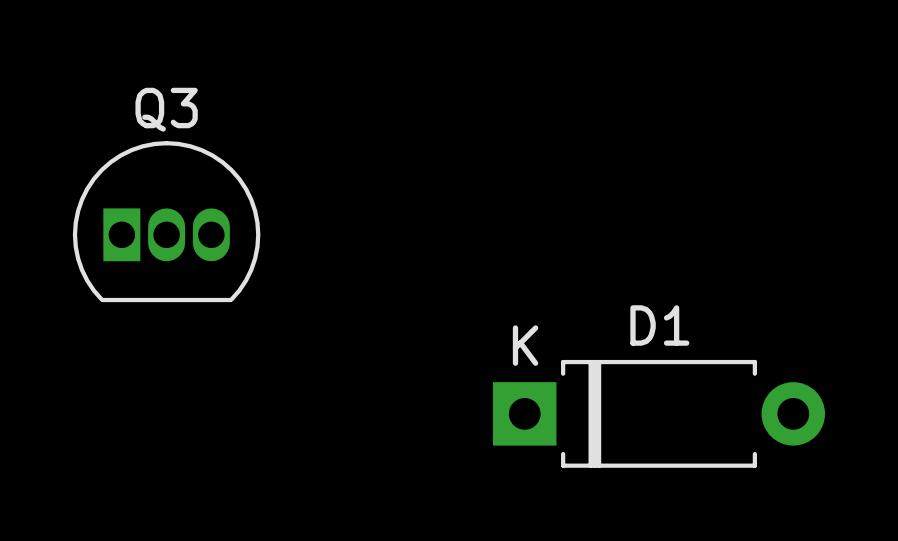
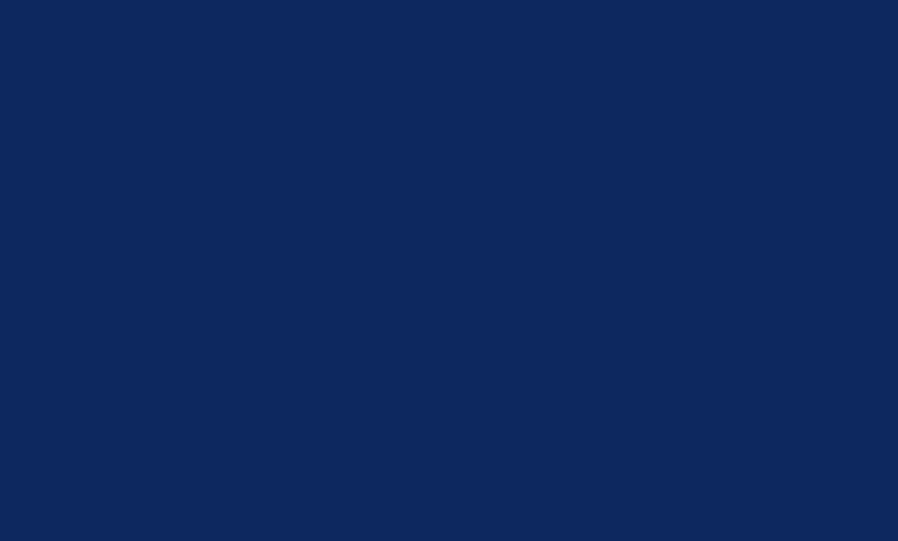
Q3: (166, 221) -> none
D1: (659, 413) -> none

